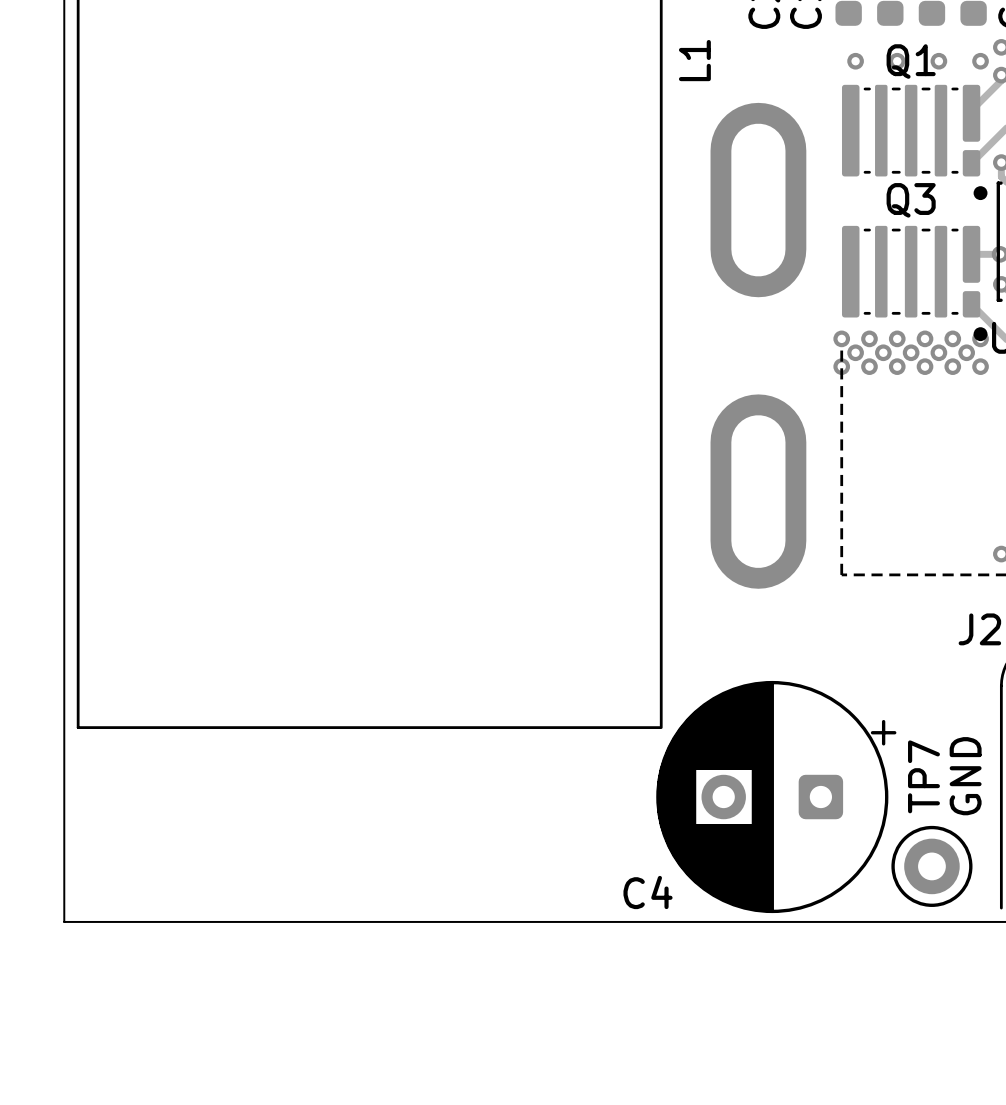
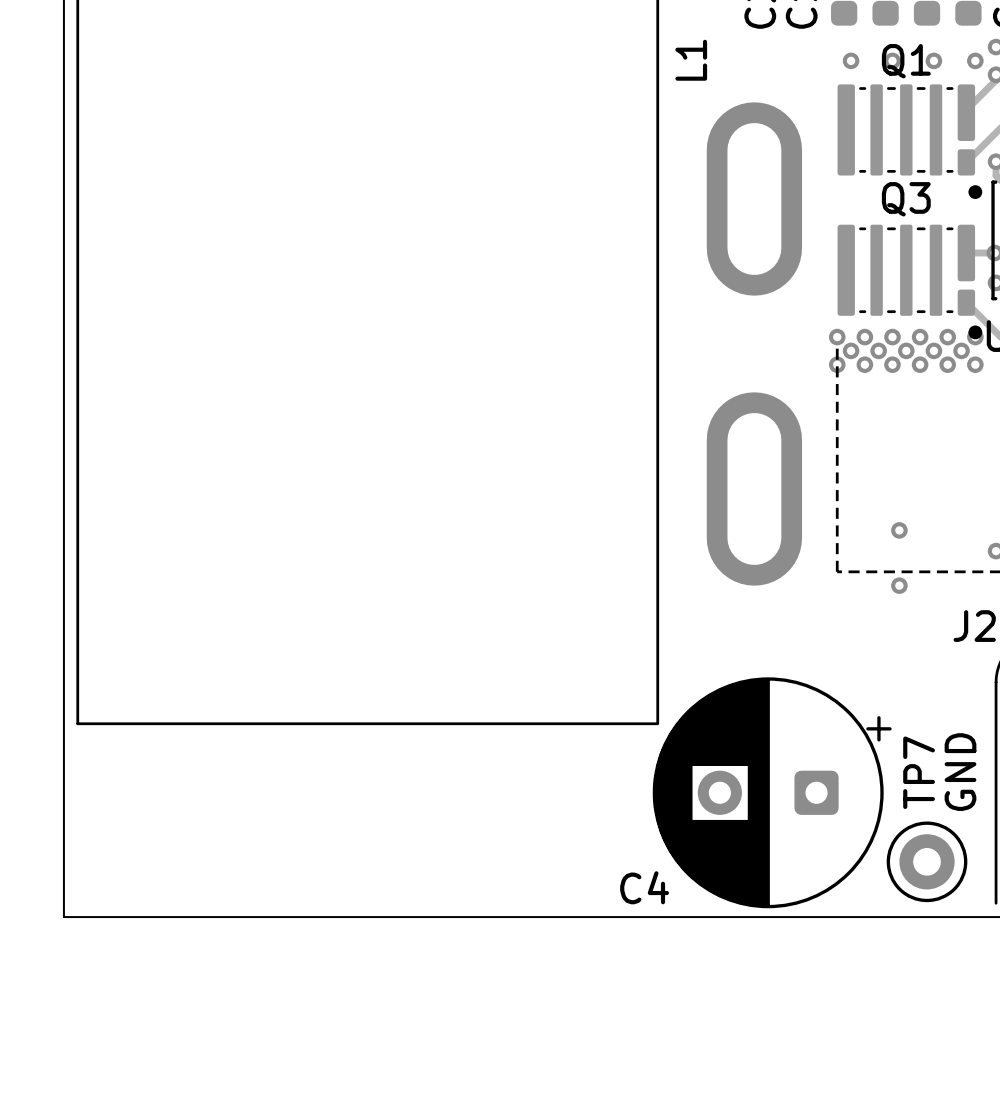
via: none -> (899, 530)
via: none -> (899, 585)

